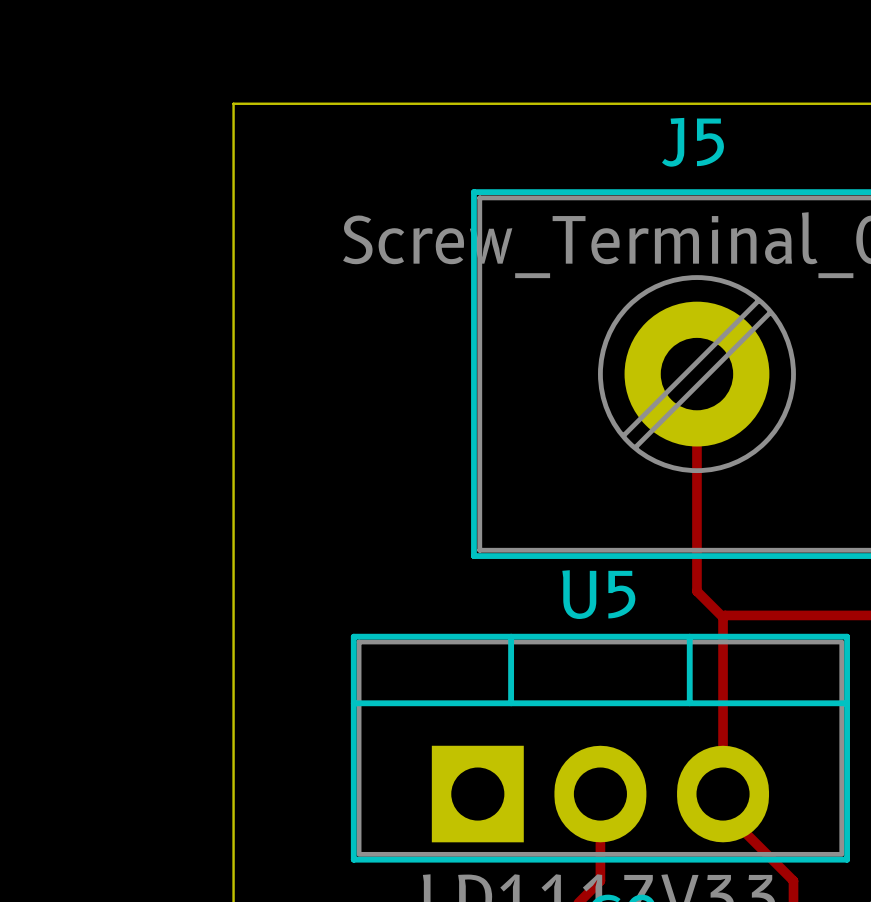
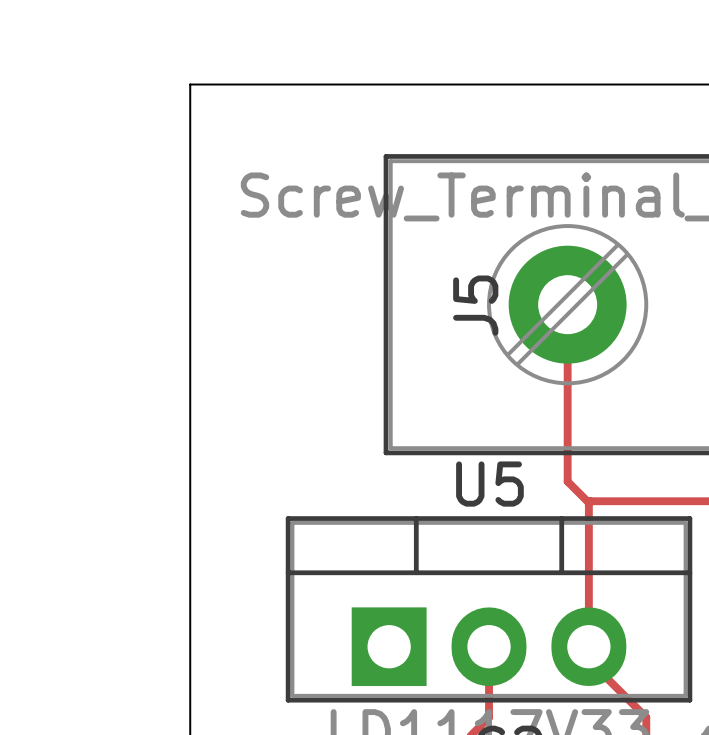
J5 name rotation: 0° (692, 142) -> 90° counterclockwise (475, 305)
J5 name position: J5 (692, 142) -> J5 (475, 305)

